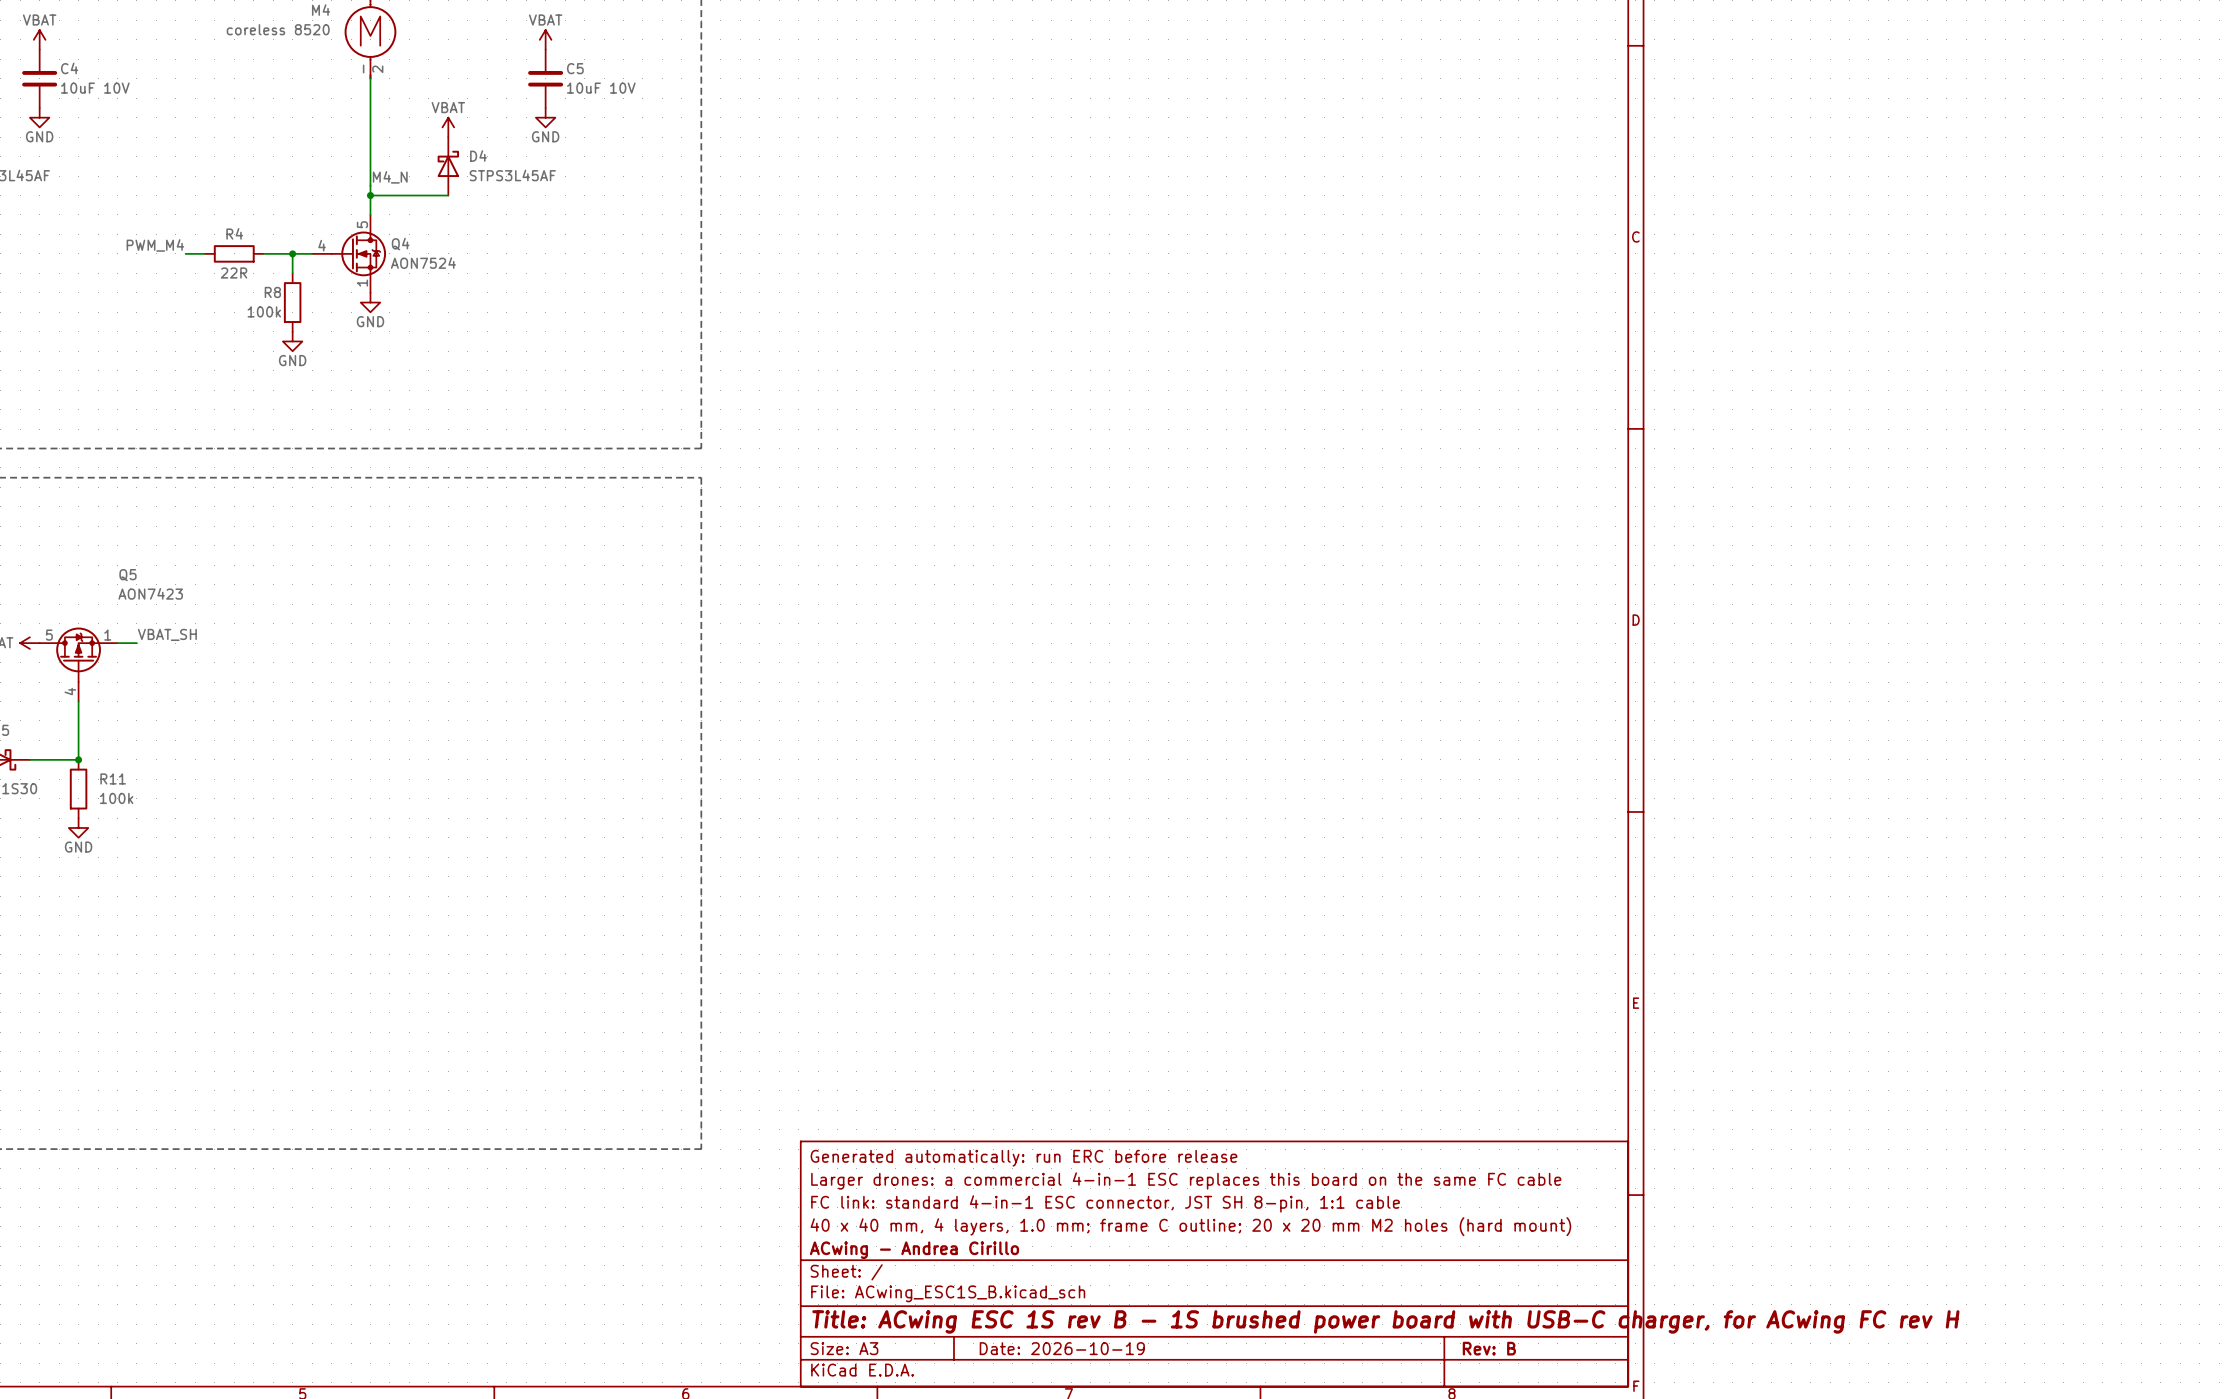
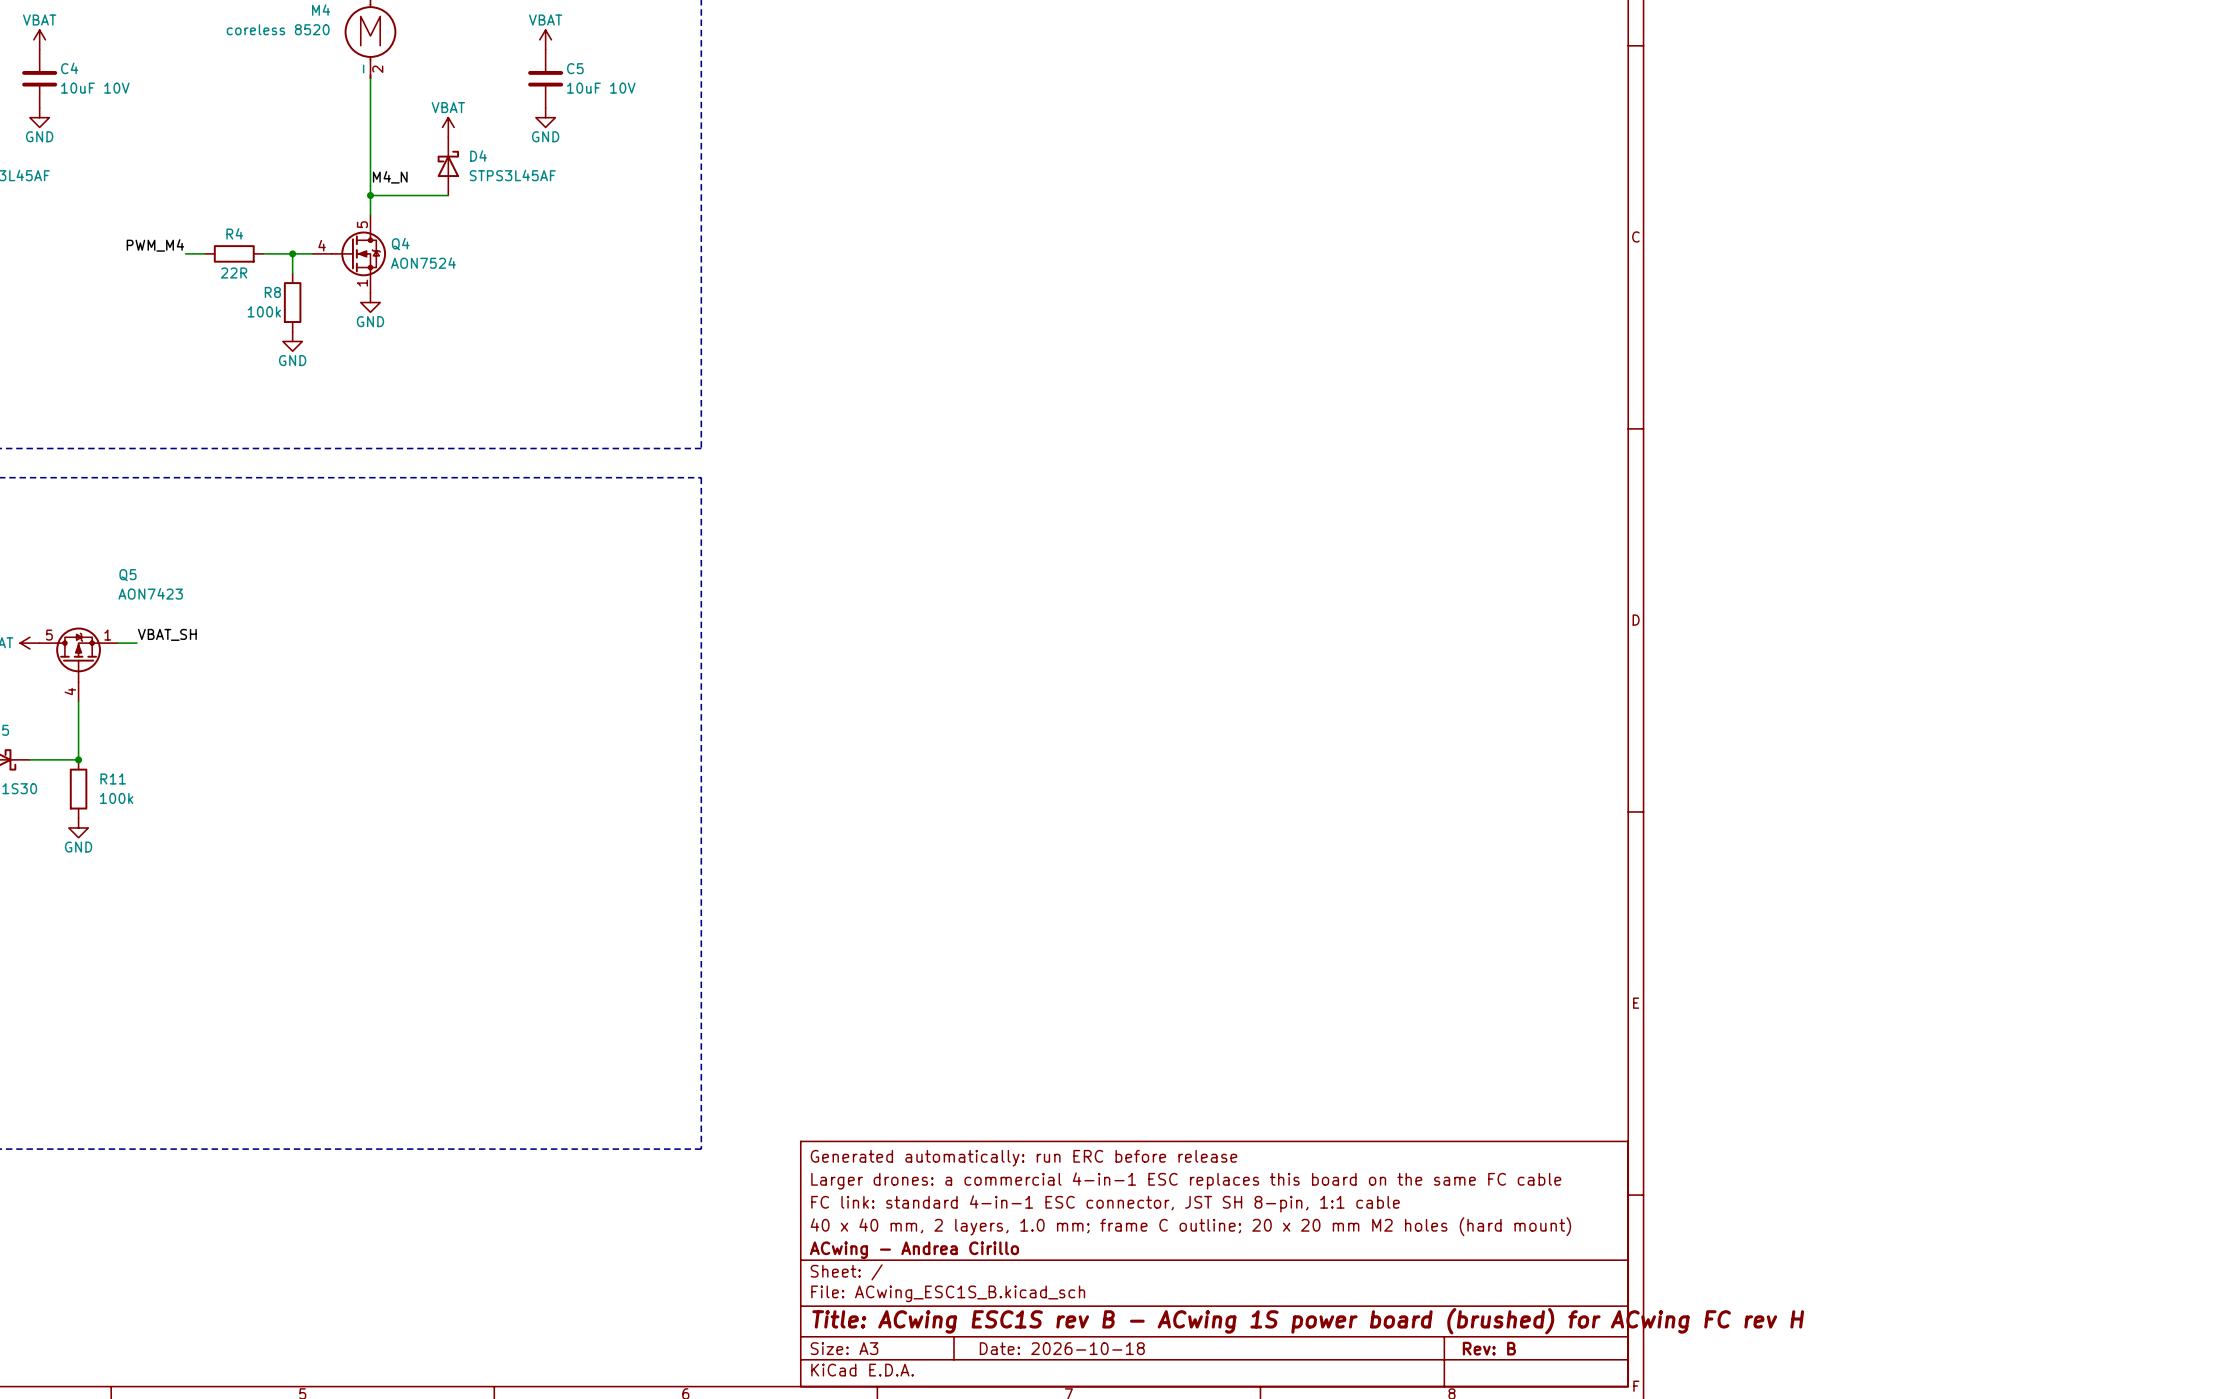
title block: 40 x 40 mm, 4 layers, 1.0 mm; frame C outline; 20 x 20 mm M2 holes (hard mount) (1190, 1226) -> 40 x 40 mm, 2 layers, 1.0 mm; frame C outline; 20 x 20 mm M2 holes (hard mount) (1190, 1226)
title block: Title: ACwing ESC 1S rev B - 1S brushed power board with USB-C charger, for ACwing FC rev H (1385, 1321) -> Title: ACwing ESC1S rev B - ACwing 1S power board (brushed) for ACwing FC rev H (1308, 1321)
title block: Date: 2026-10-19 (1062, 1348) -> Date: 2026-10-18 (1062, 1348)

